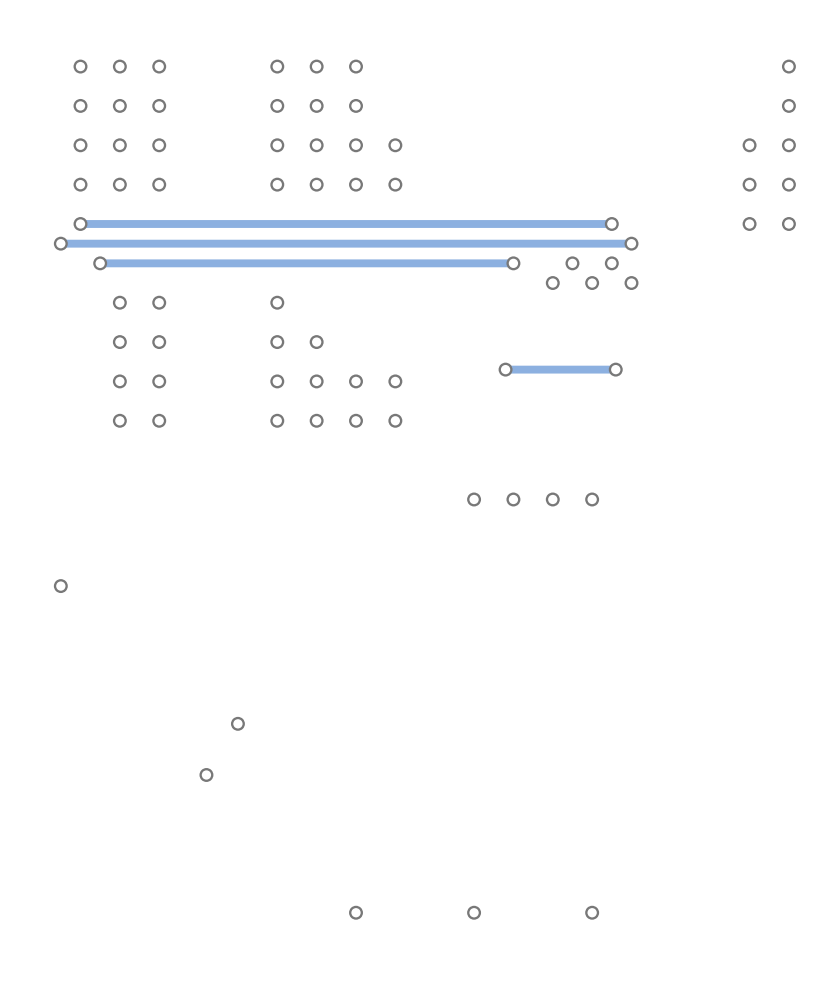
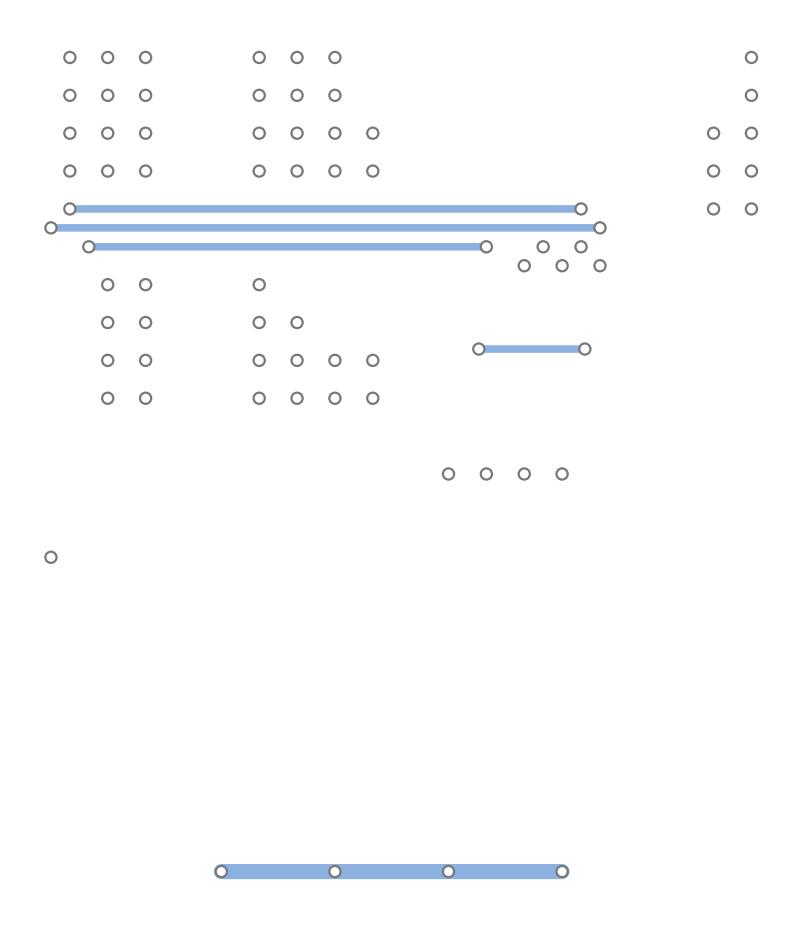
via: (237, 723) -> none
via: (206, 774) -> none
via: none -> (221, 871)
track: none -> (562, 871) (221, 871)

